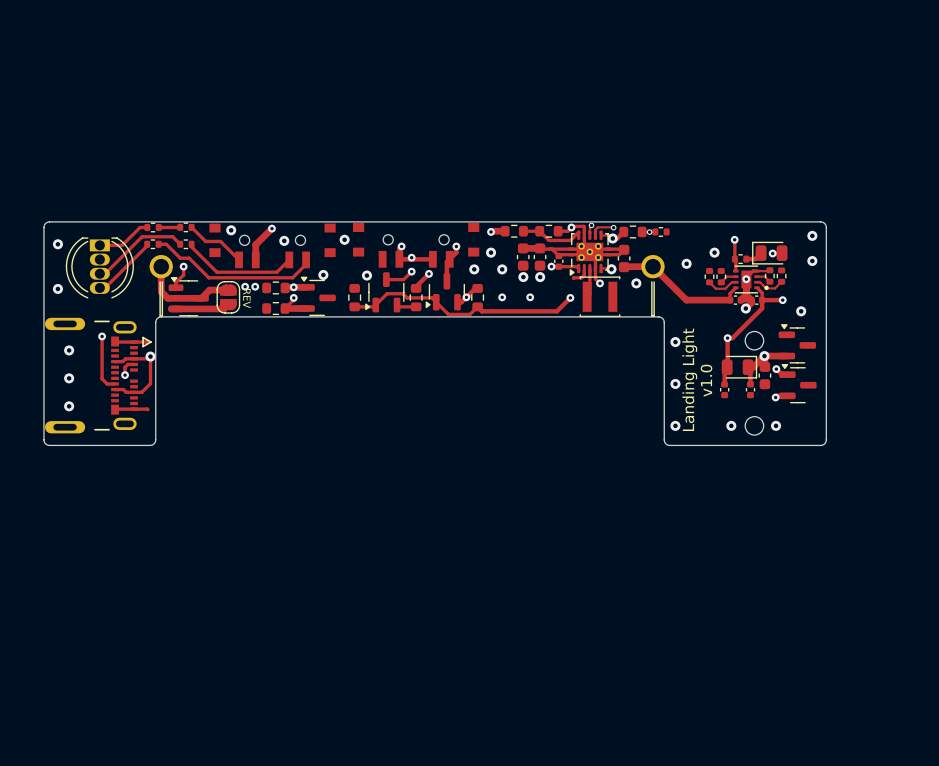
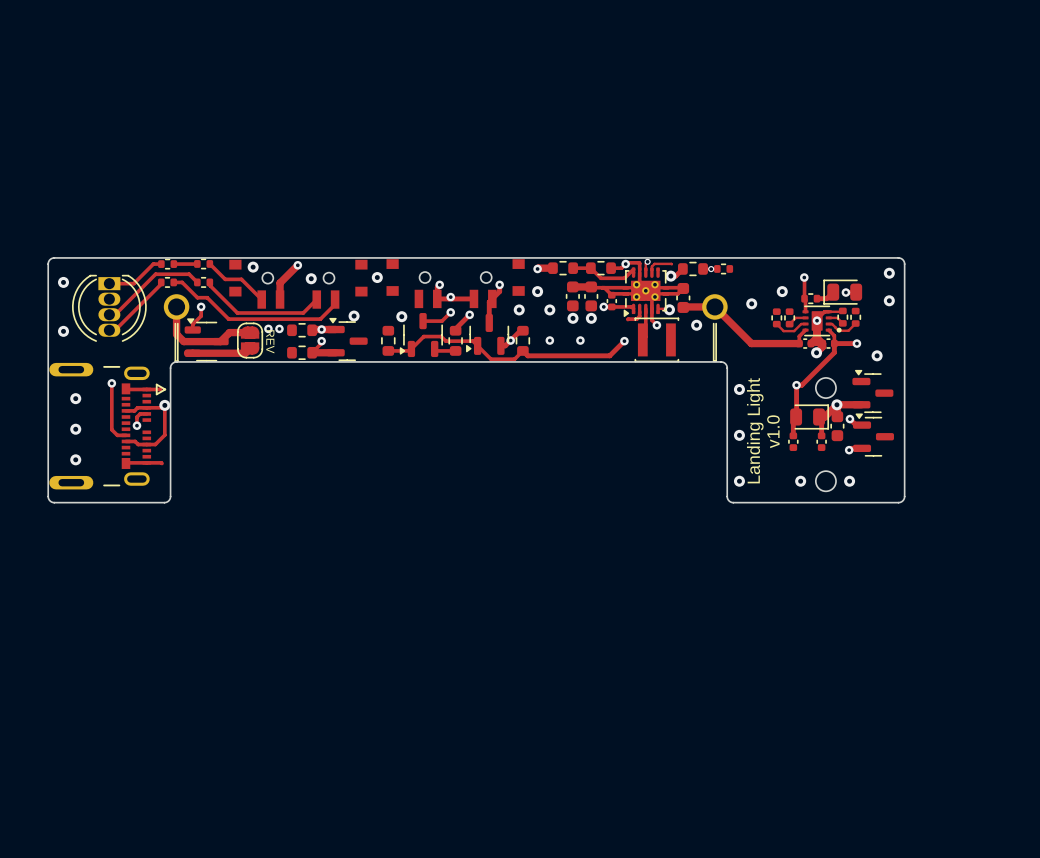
via: (613, 227) -> none
track: (601, 235) (609, 235) (612, 238) -> none

